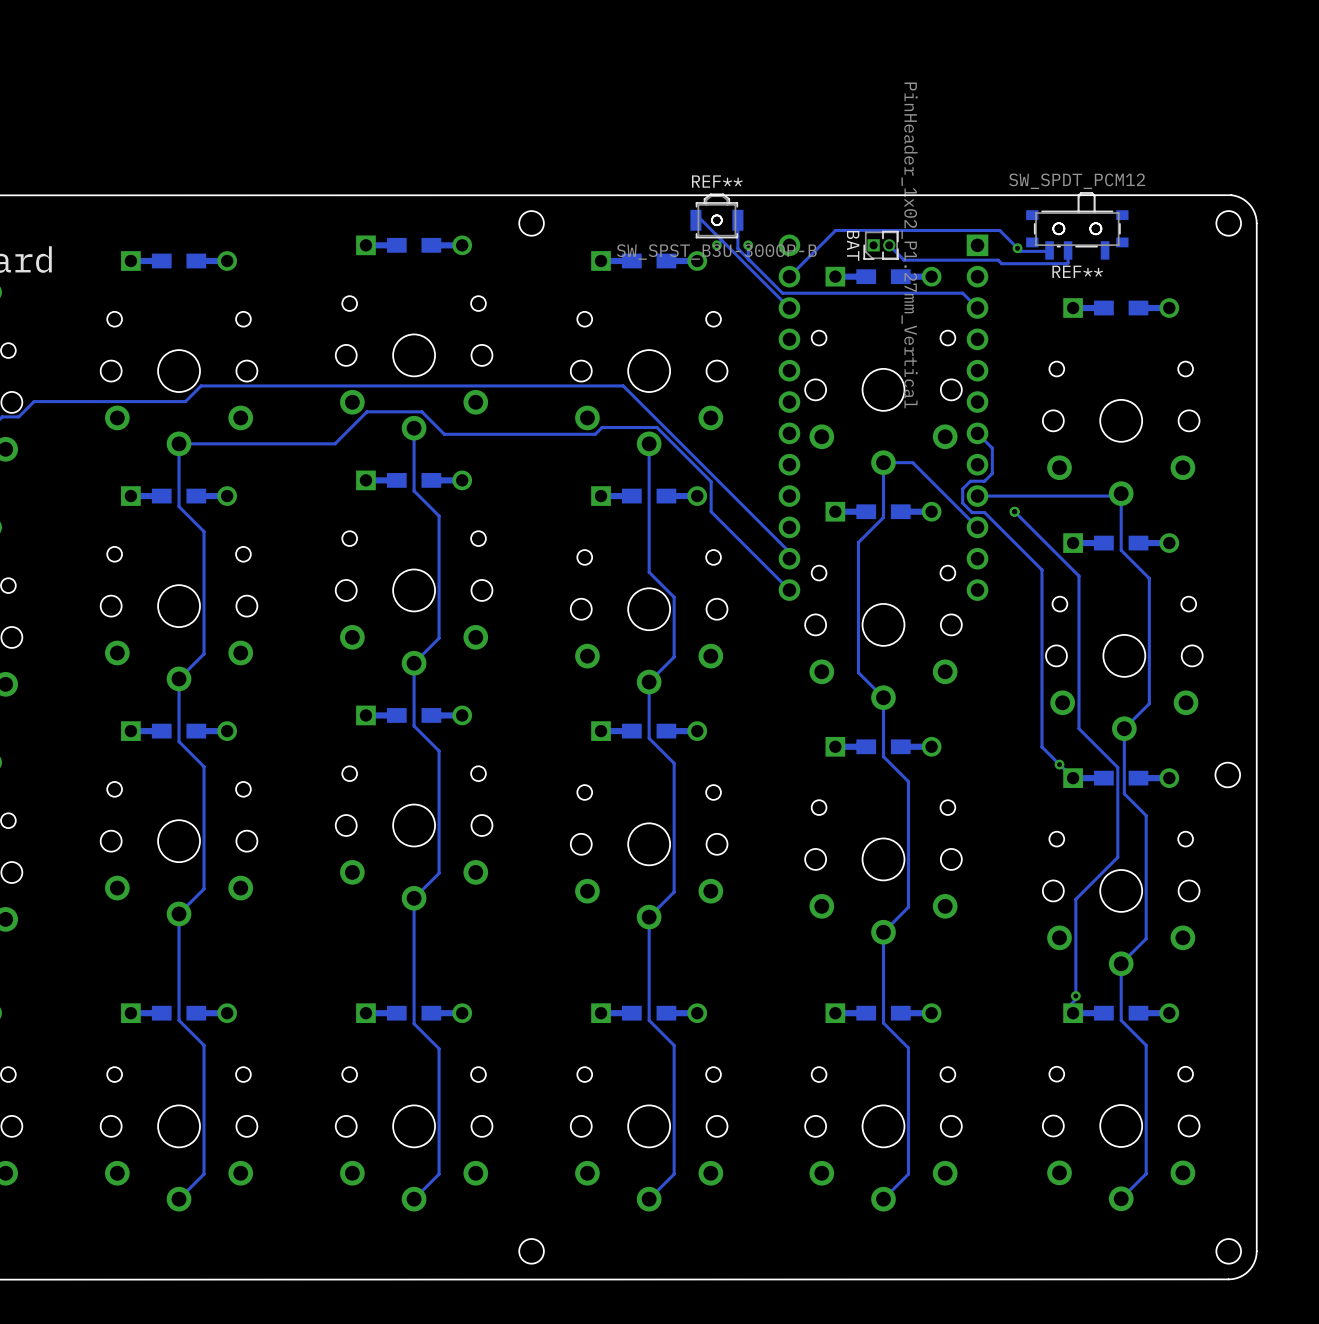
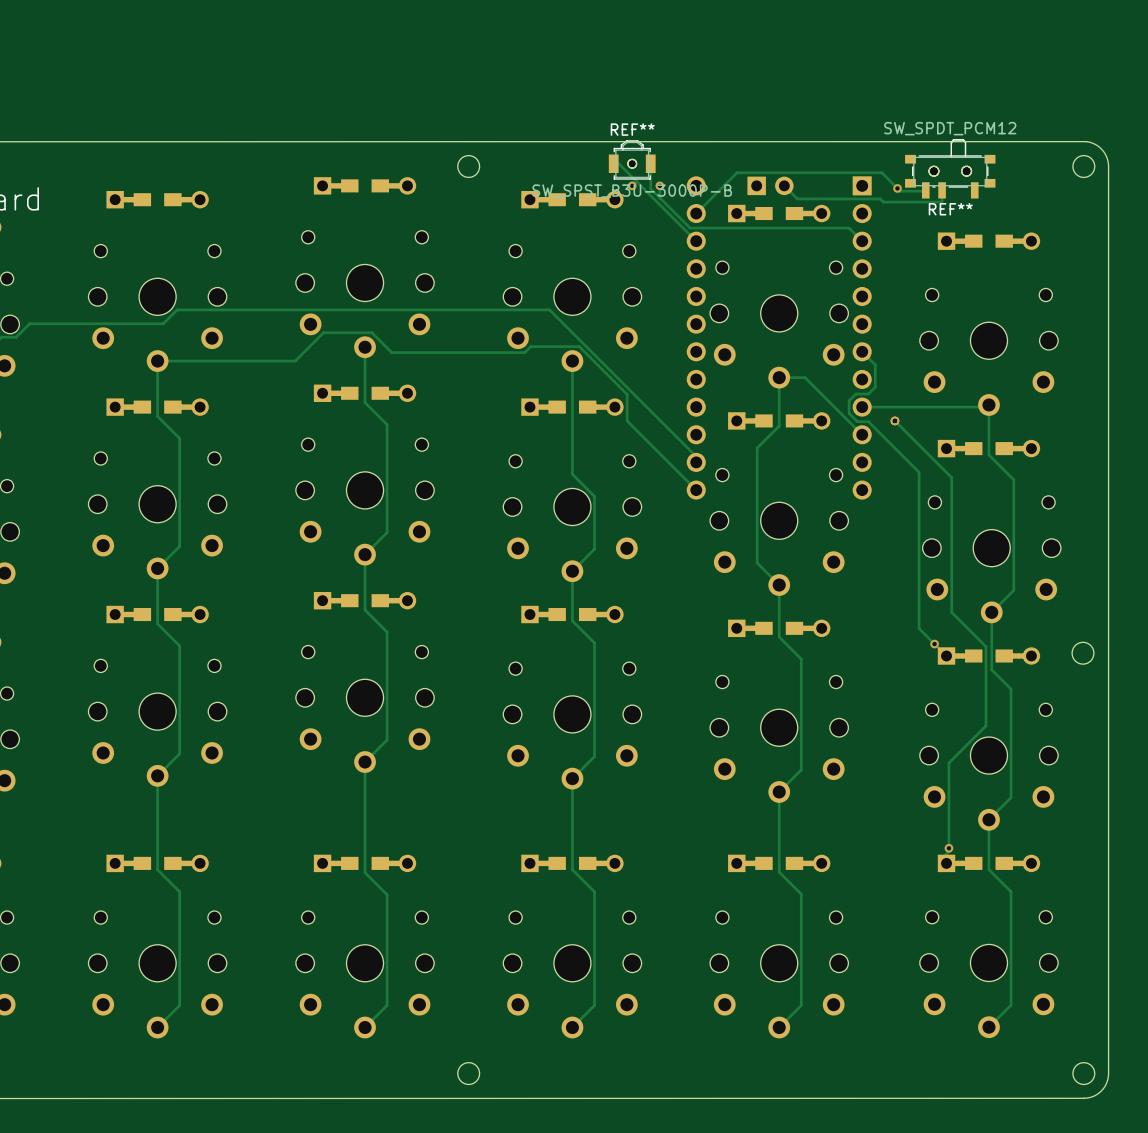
part: none -> (770, 185)
BAT: PinHeader_1x02_P1.27mm_Vertical (881, 245) -> none

